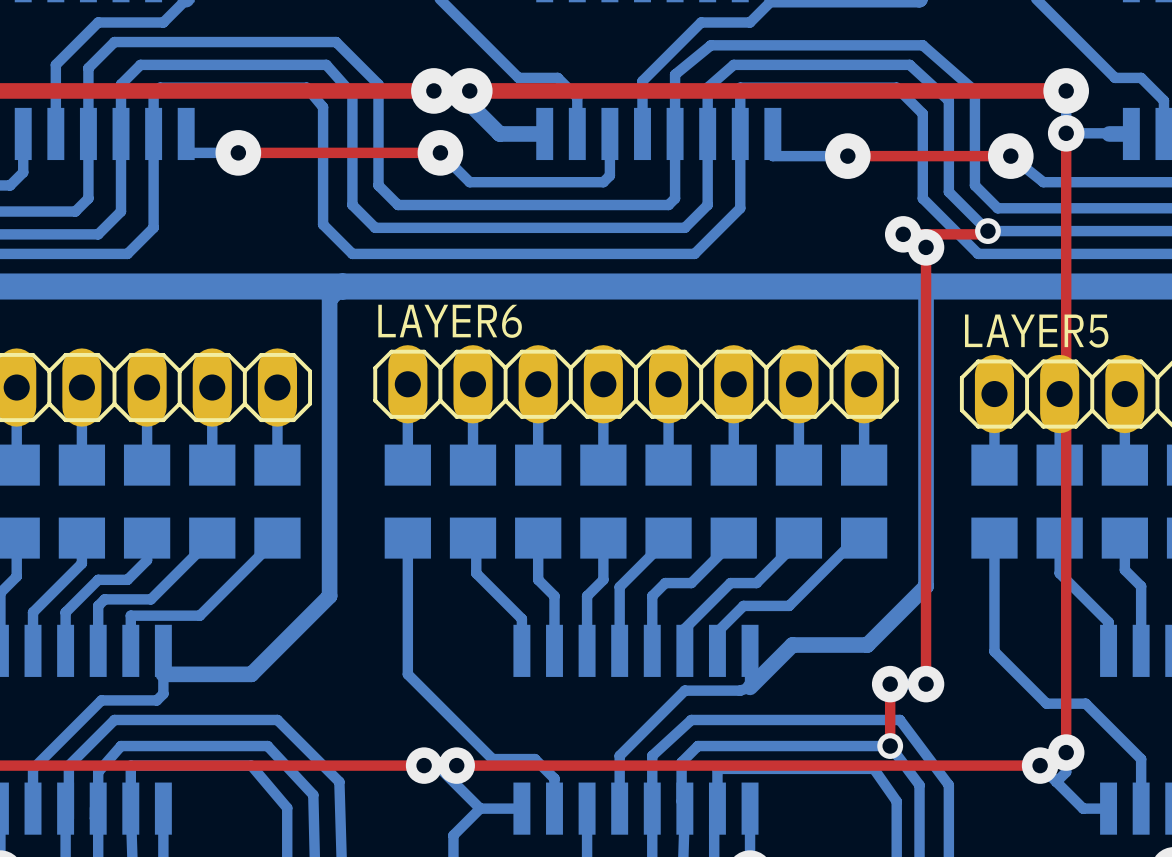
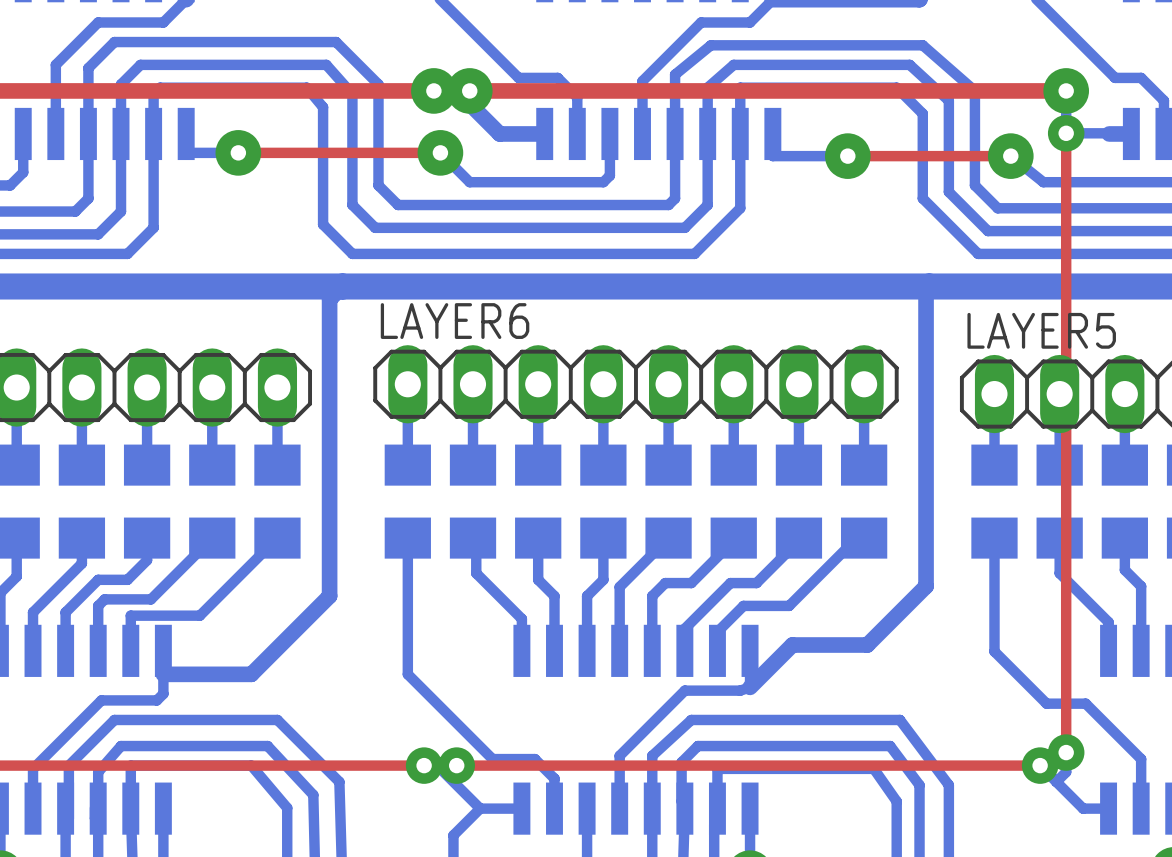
top track: (987, 231) (987, 234) (903, 234) -> none
via: (987, 231) -> none
via: (903, 234) -> none
top track: (926, 247) (926, 684) -> none
via: (926, 247) -> none
top track: (890, 684) (890, 746) -> none
via: (890, 684) -> none
via: (926, 684) -> none
via: (890, 746) -> none

